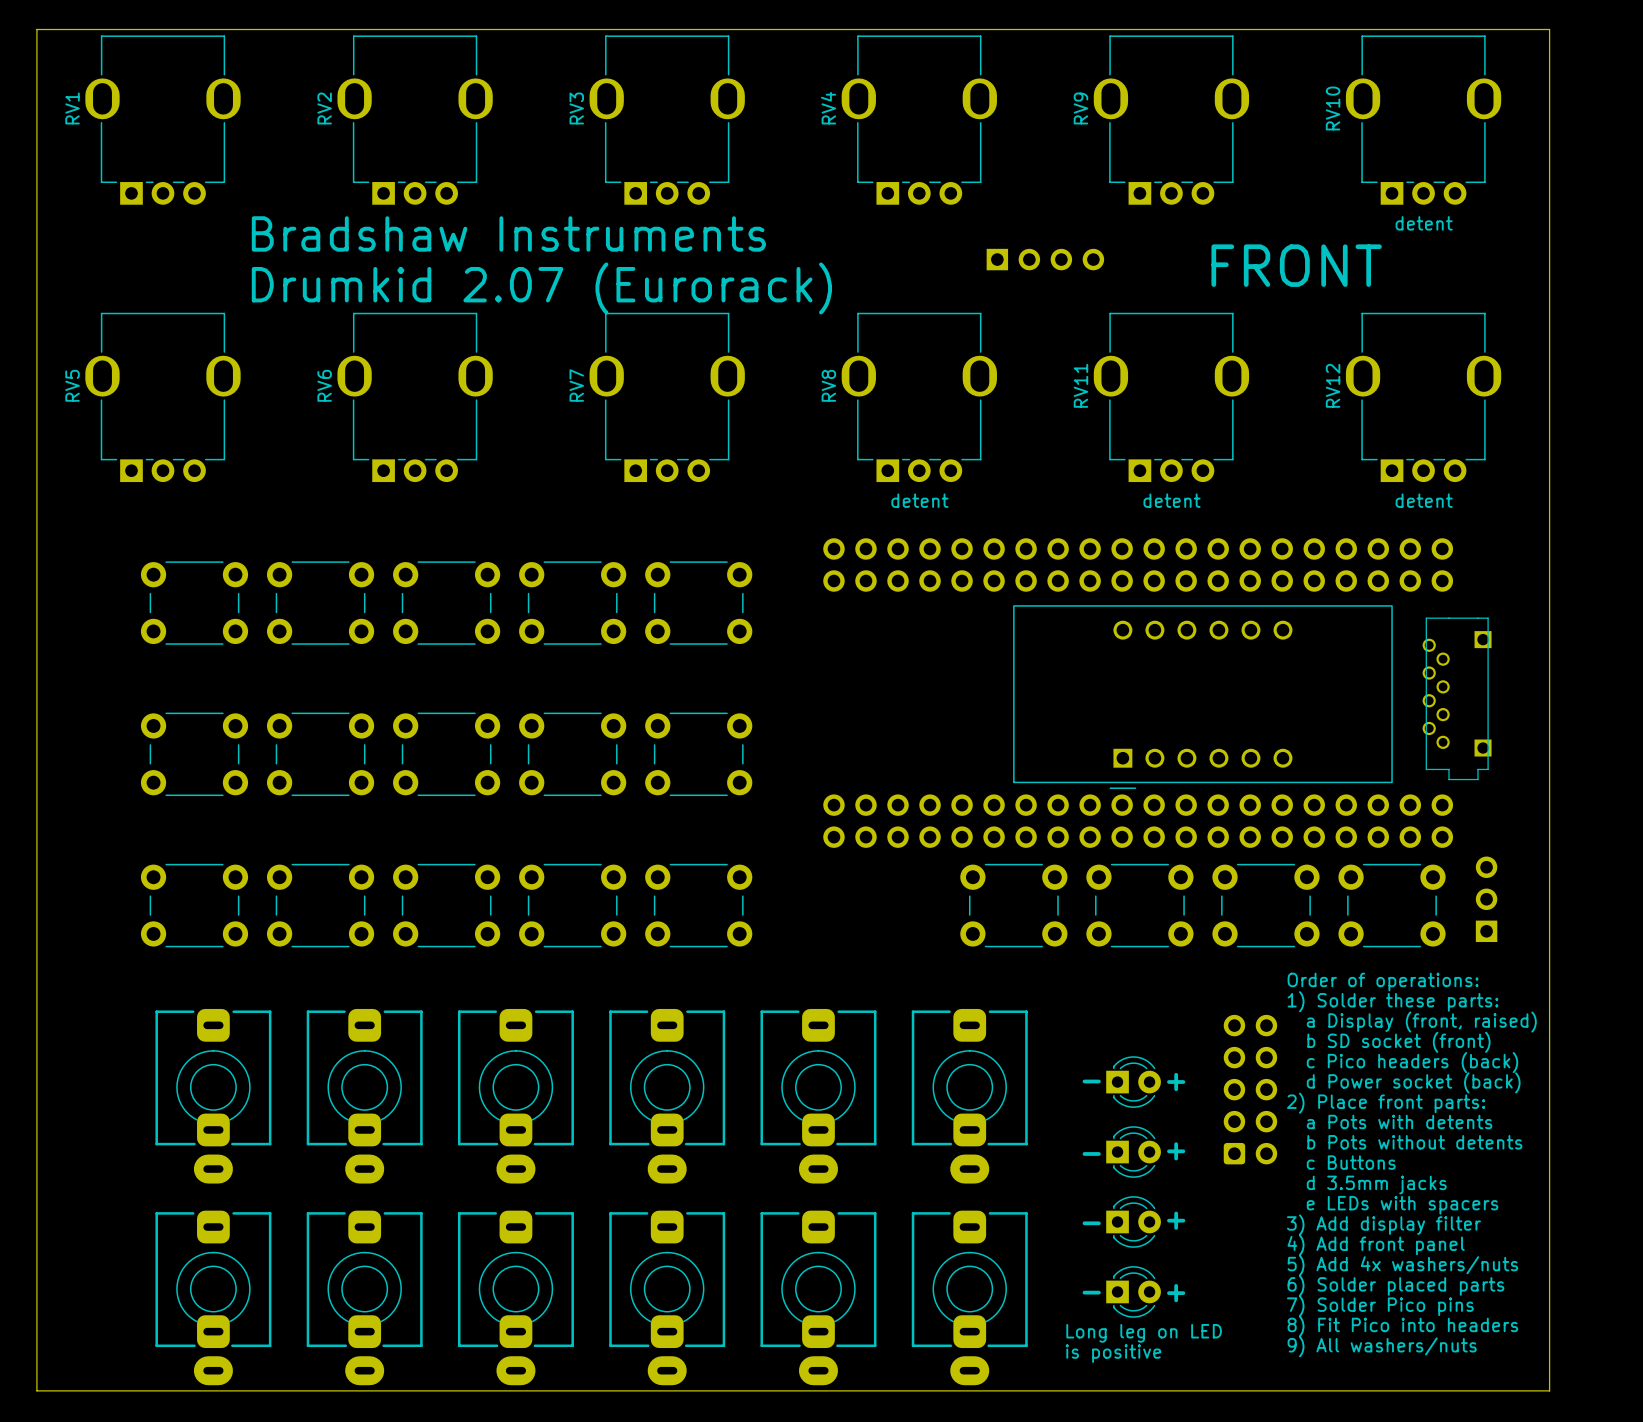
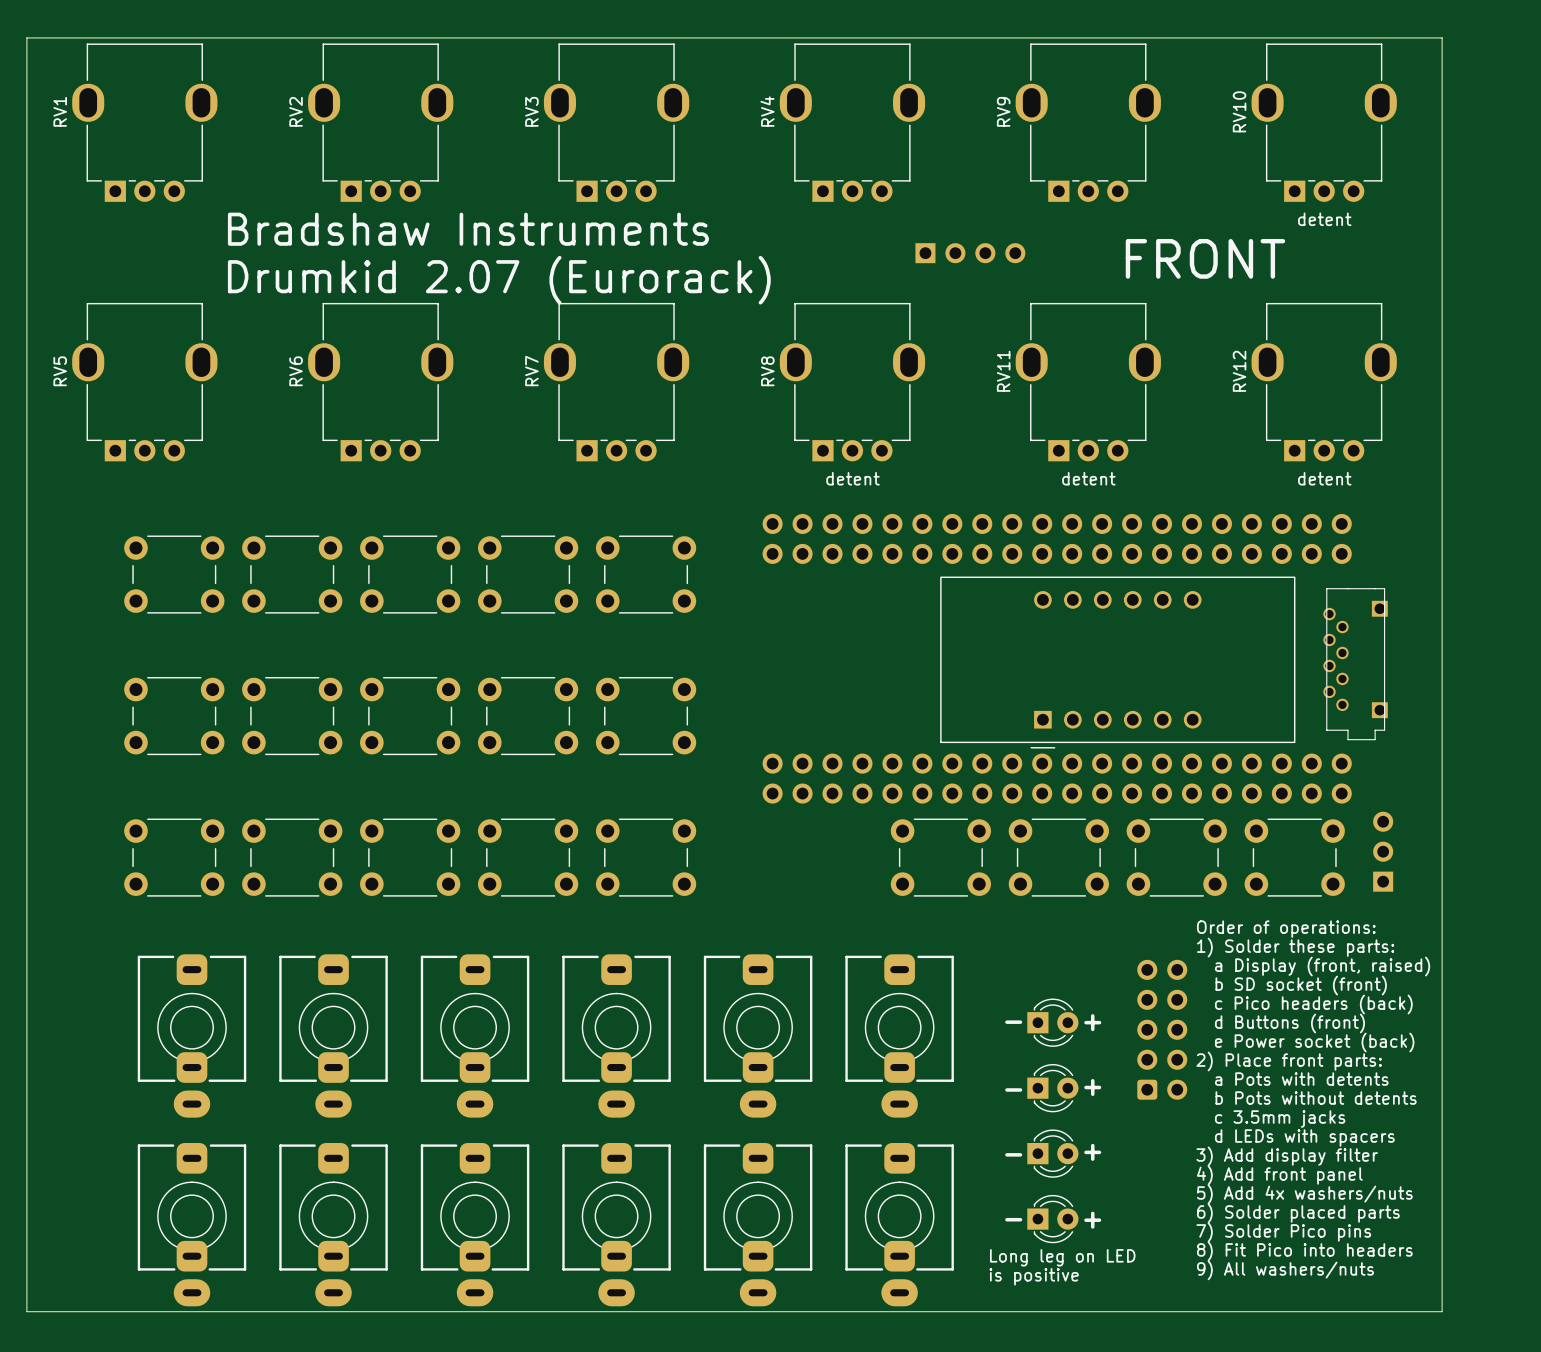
text: d Power socket (back) (1413, 1082) -> d Buttons (front) (1289, 1023)
text: 2) Place front parts: (1386, 1103) -> e Power socket (back) (1314, 1042)
text: a Pots with detents (1399, 1121) -> 2) Place front parts: (1289, 1061)
text: b Pots without detents (1414, 1142) -> a Pots with detents (1301, 1079)
text: c Buttons (1351, 1162) -> b Pots without detents (1316, 1098)
text: d 3.5mm jacks (1376, 1184) -> c 3.5mm jacks (1280, 1118)
text: e LEDs with spacers (1402, 1205) -> d LEDs with spacers (1304, 1137)

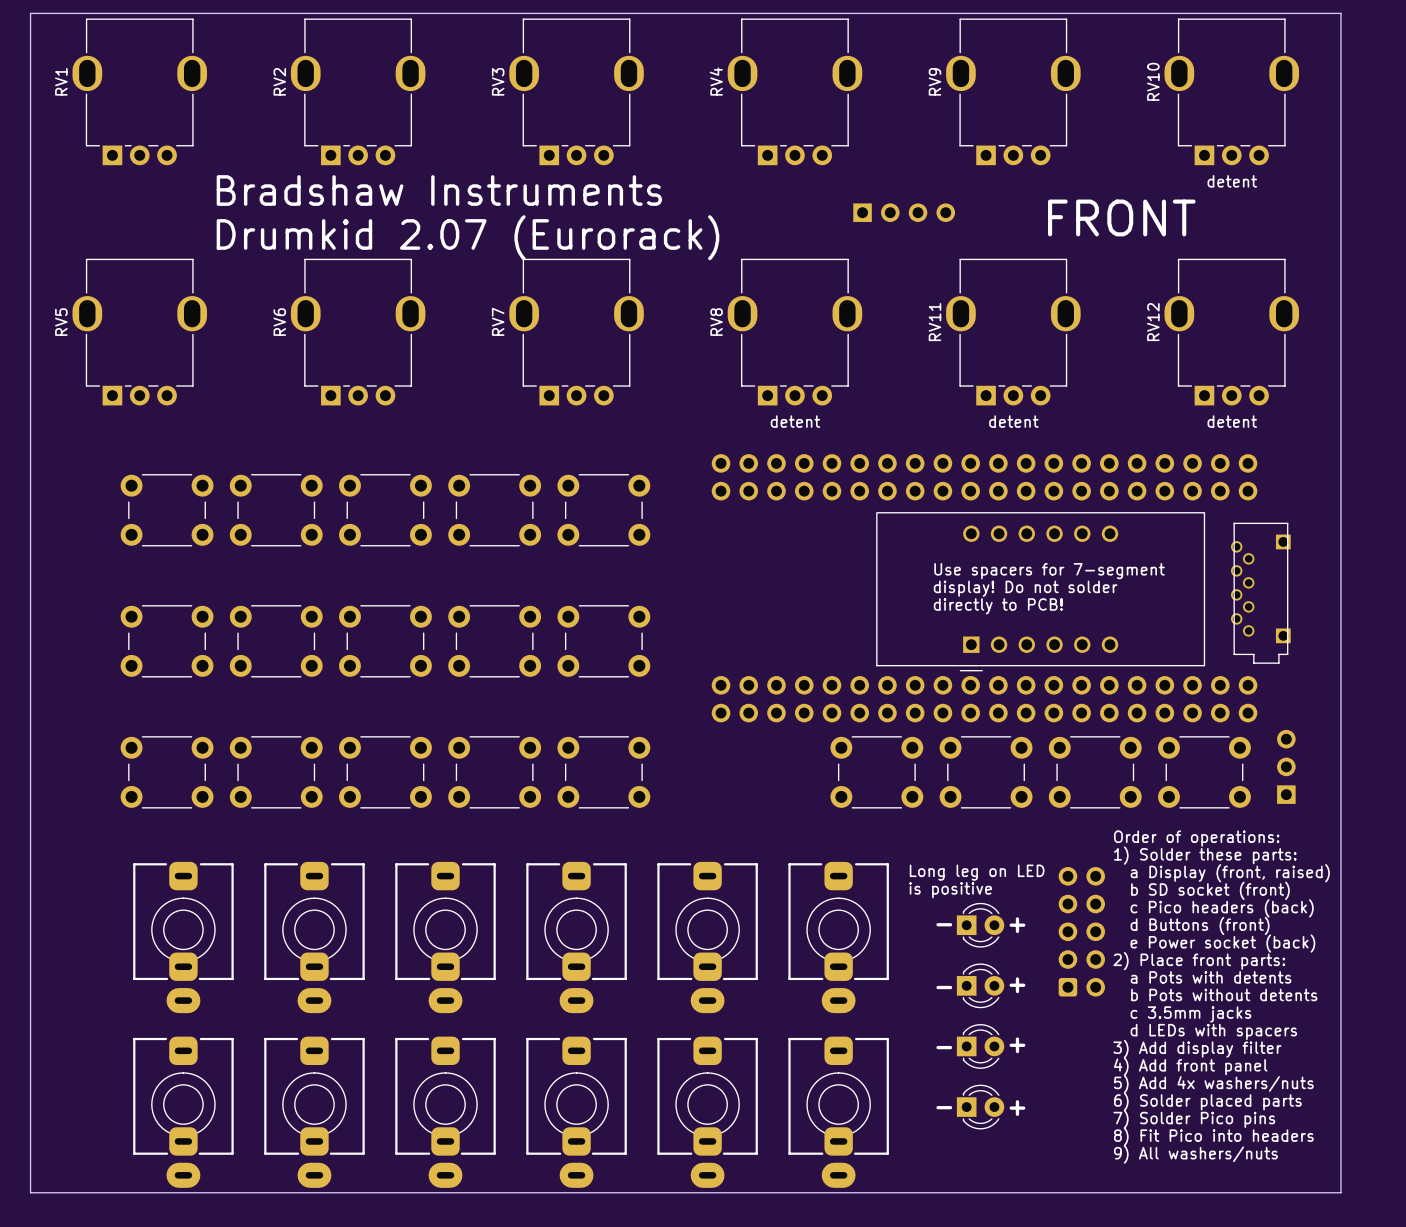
text: none -> Use spacers for 7-segment (1049, 571)
text: none -> display! Do not solder (1025, 588)
text: none -> directly to PCB! (998, 606)
text position: Long leg on LED (1062, 1257) -> Long leg on LED (977, 872)
text position: is positive (1034, 1276) -> is positive (950, 890)

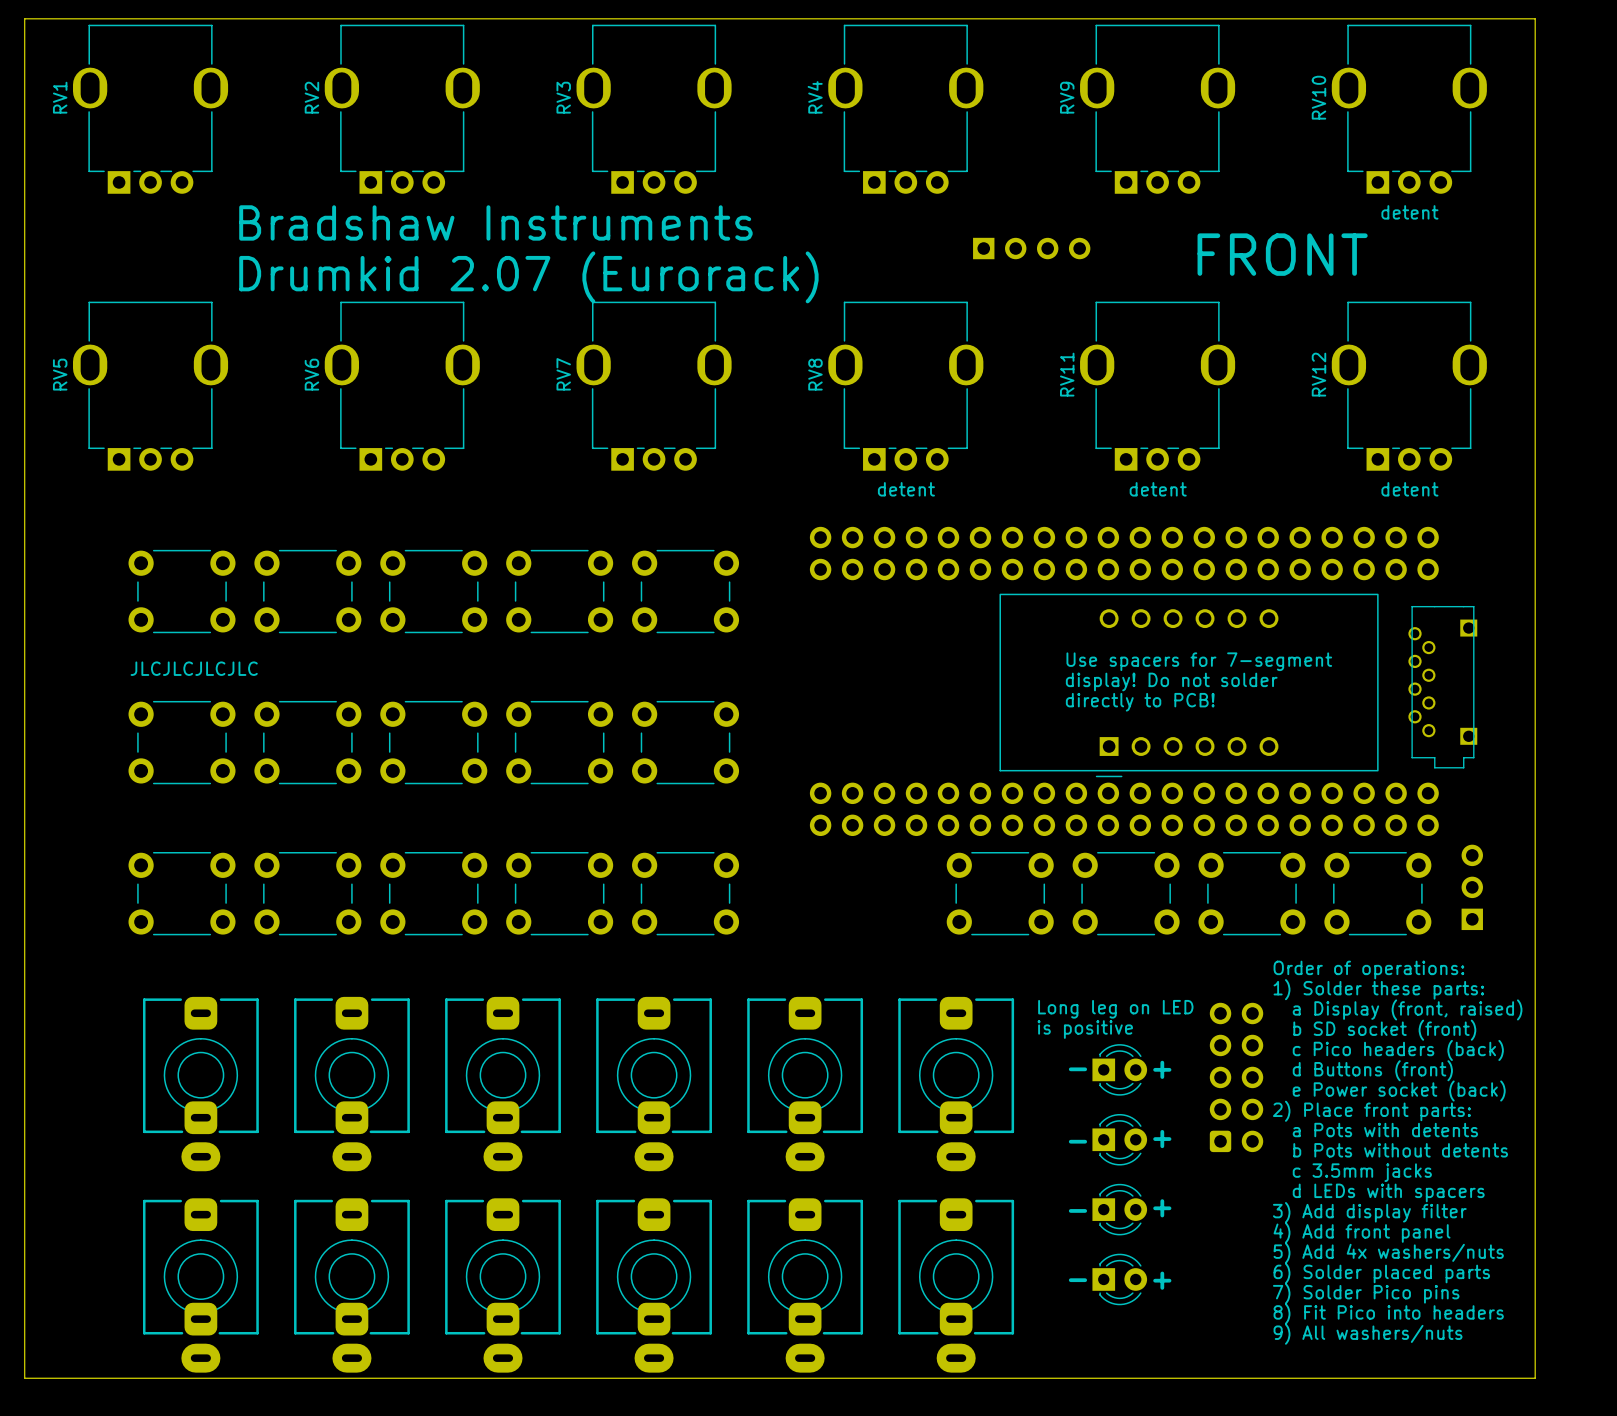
text: none -> JLCJLCJLCJLC (194, 668)

